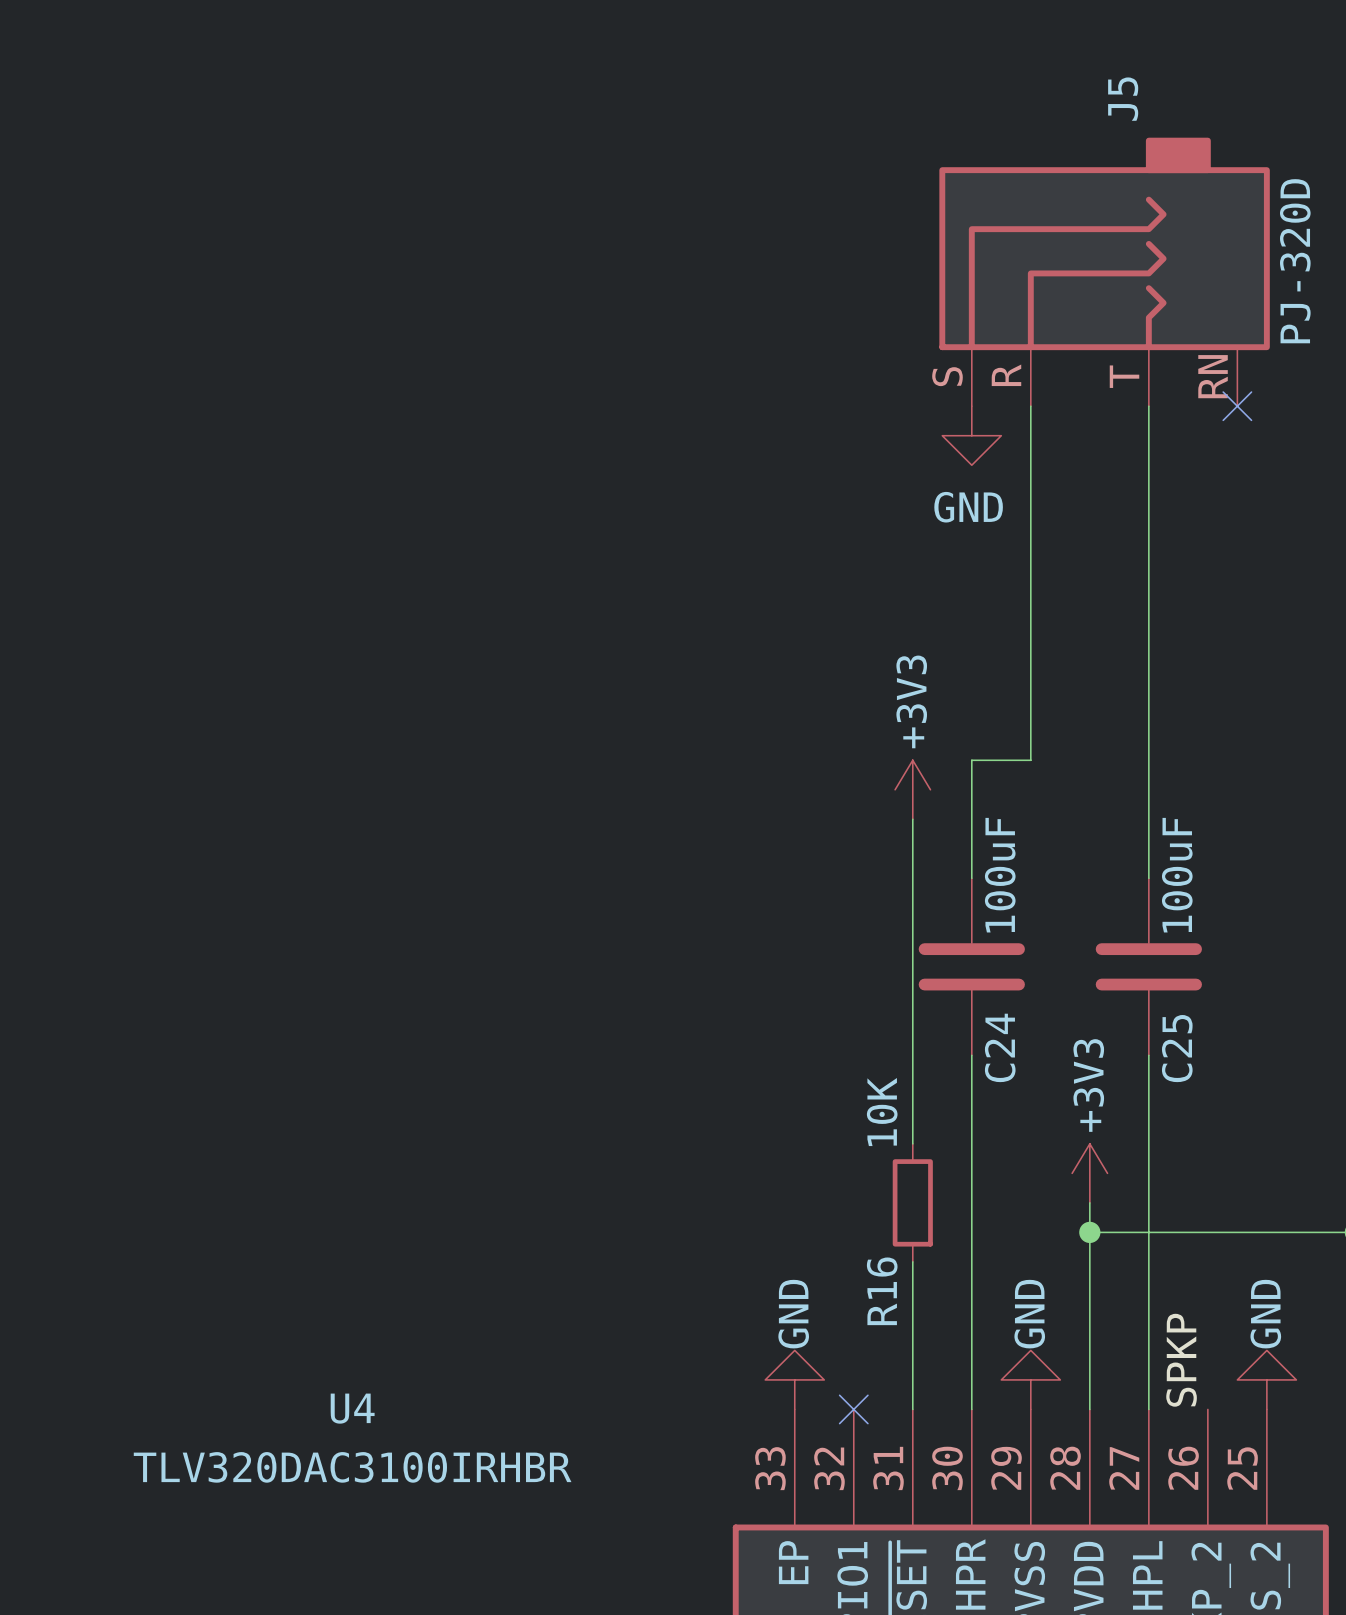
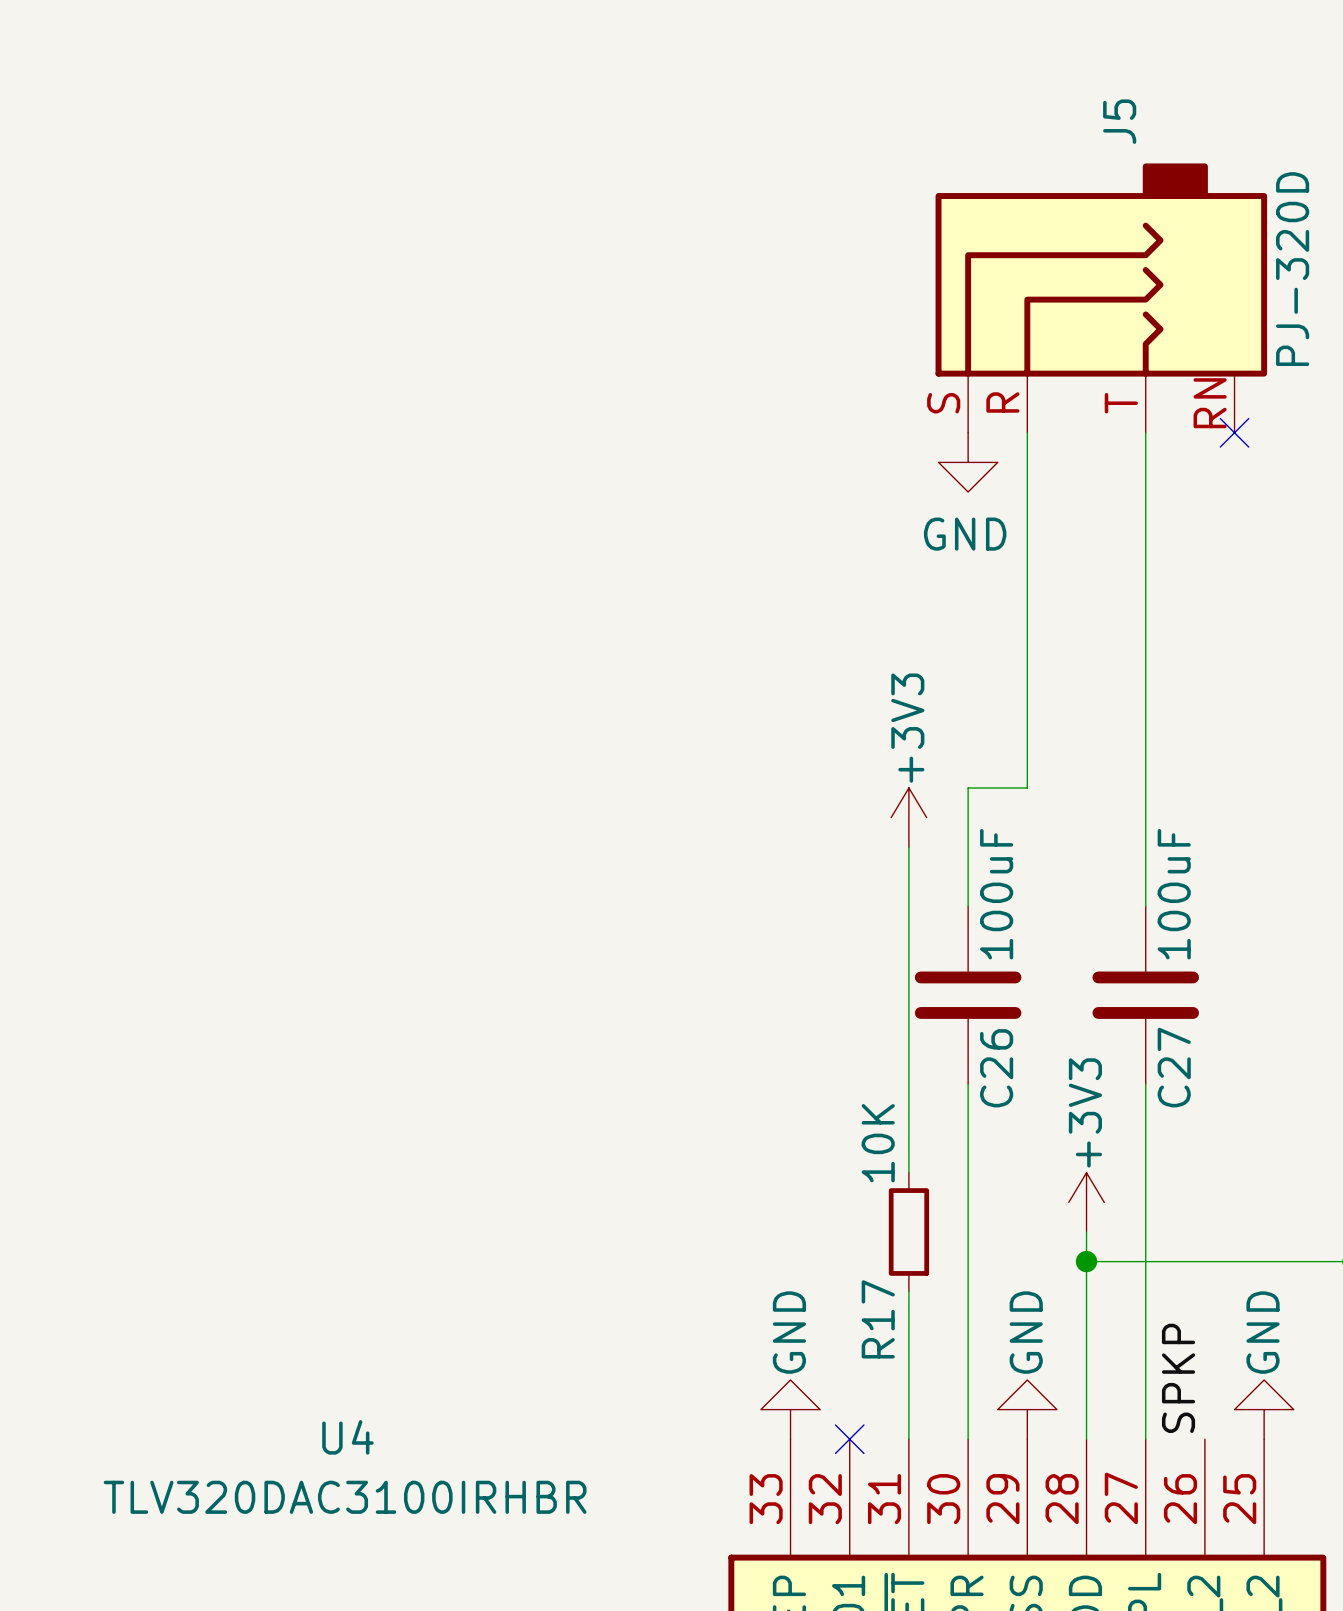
C24 name: C24 (1000, 1047) -> C26 (996, 1068)
C25 name: C25 (1177, 1048) -> C27 (1174, 1067)
R16 name: R16 (882, 1291) -> R17 (878, 1319)

